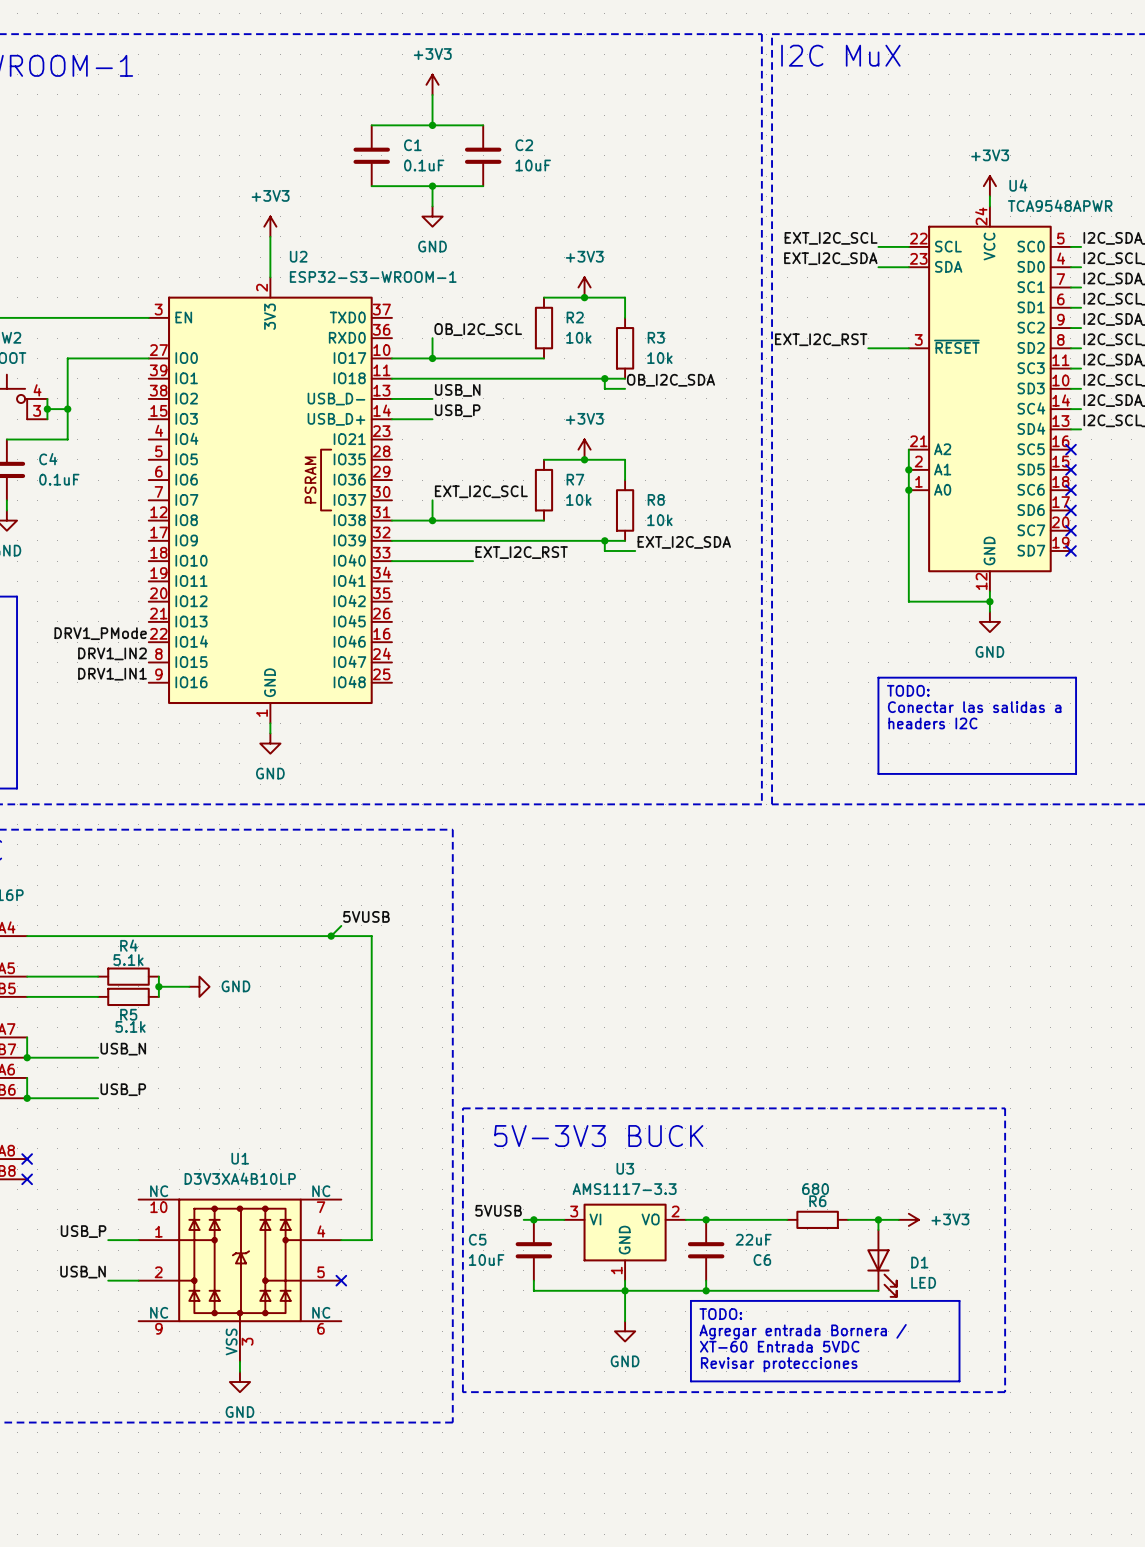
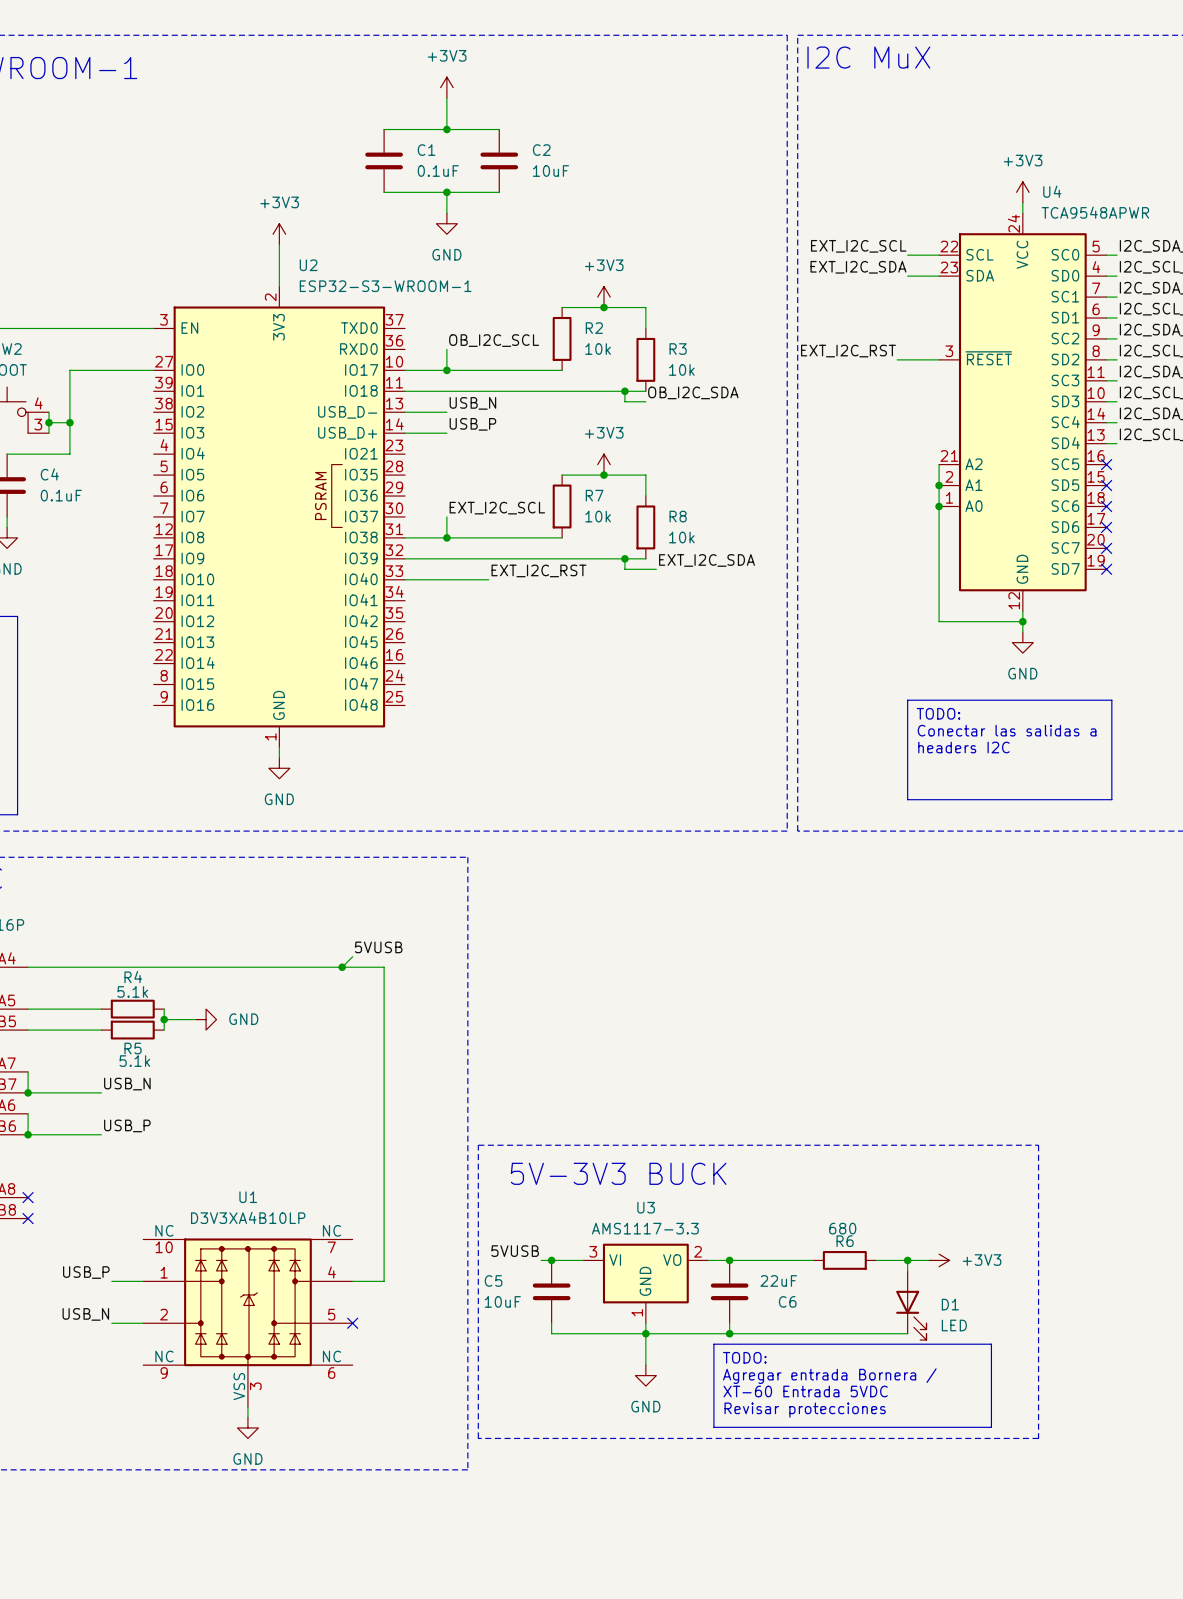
label: DRV1_PMode (100, 633) -> none
label: DRV1_IN2 (112, 653) -> none
label: DRV1_IN1 (112, 674) -> none

